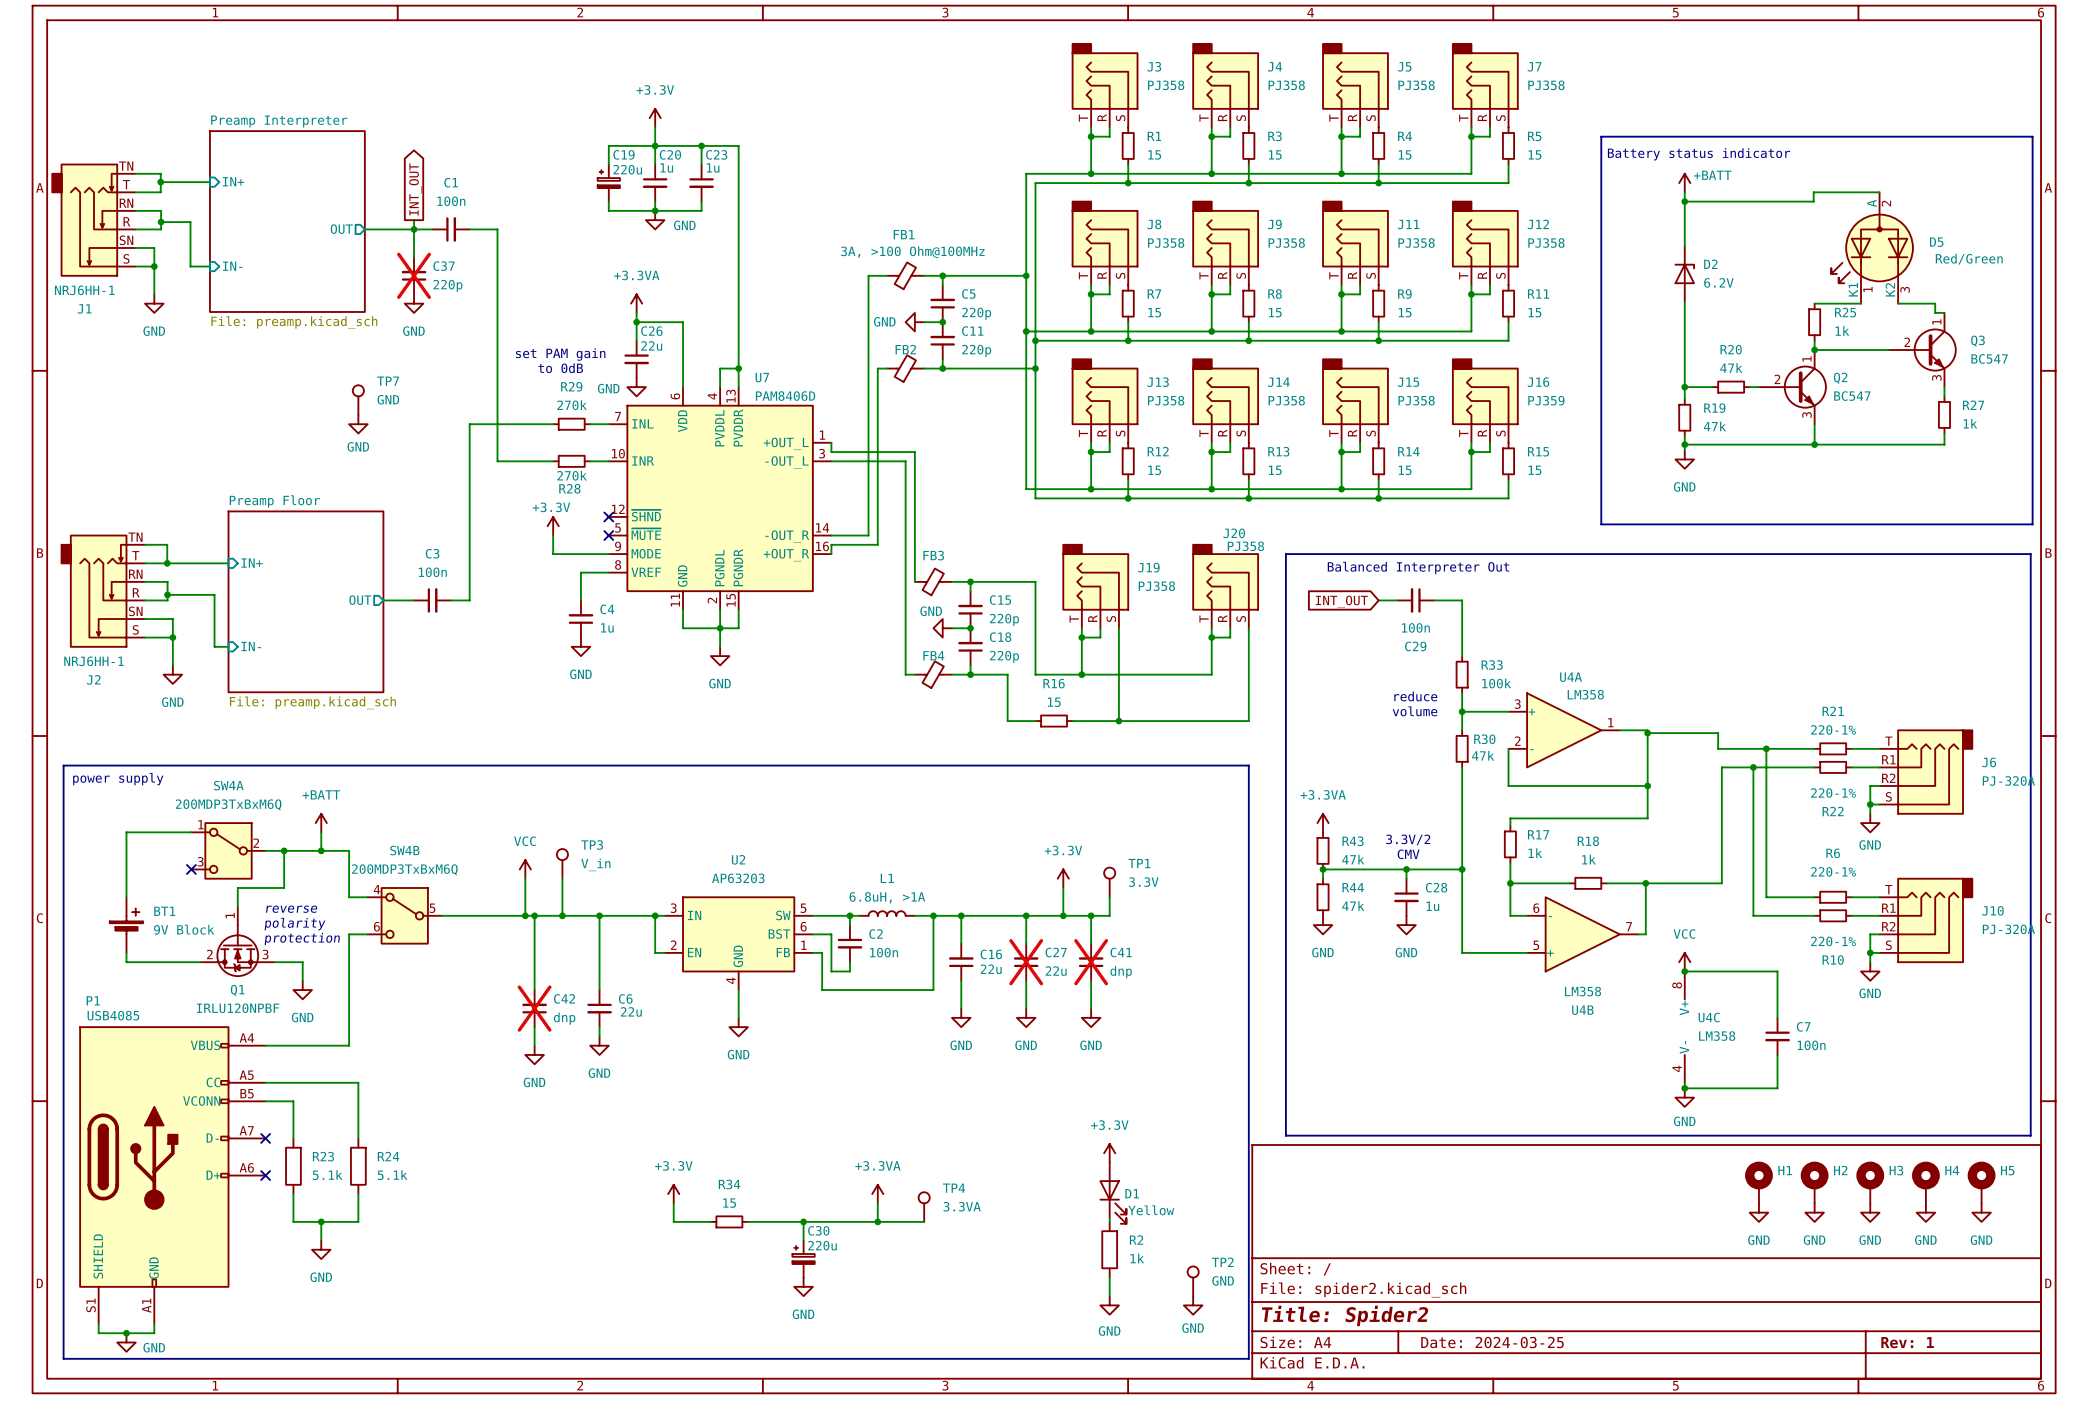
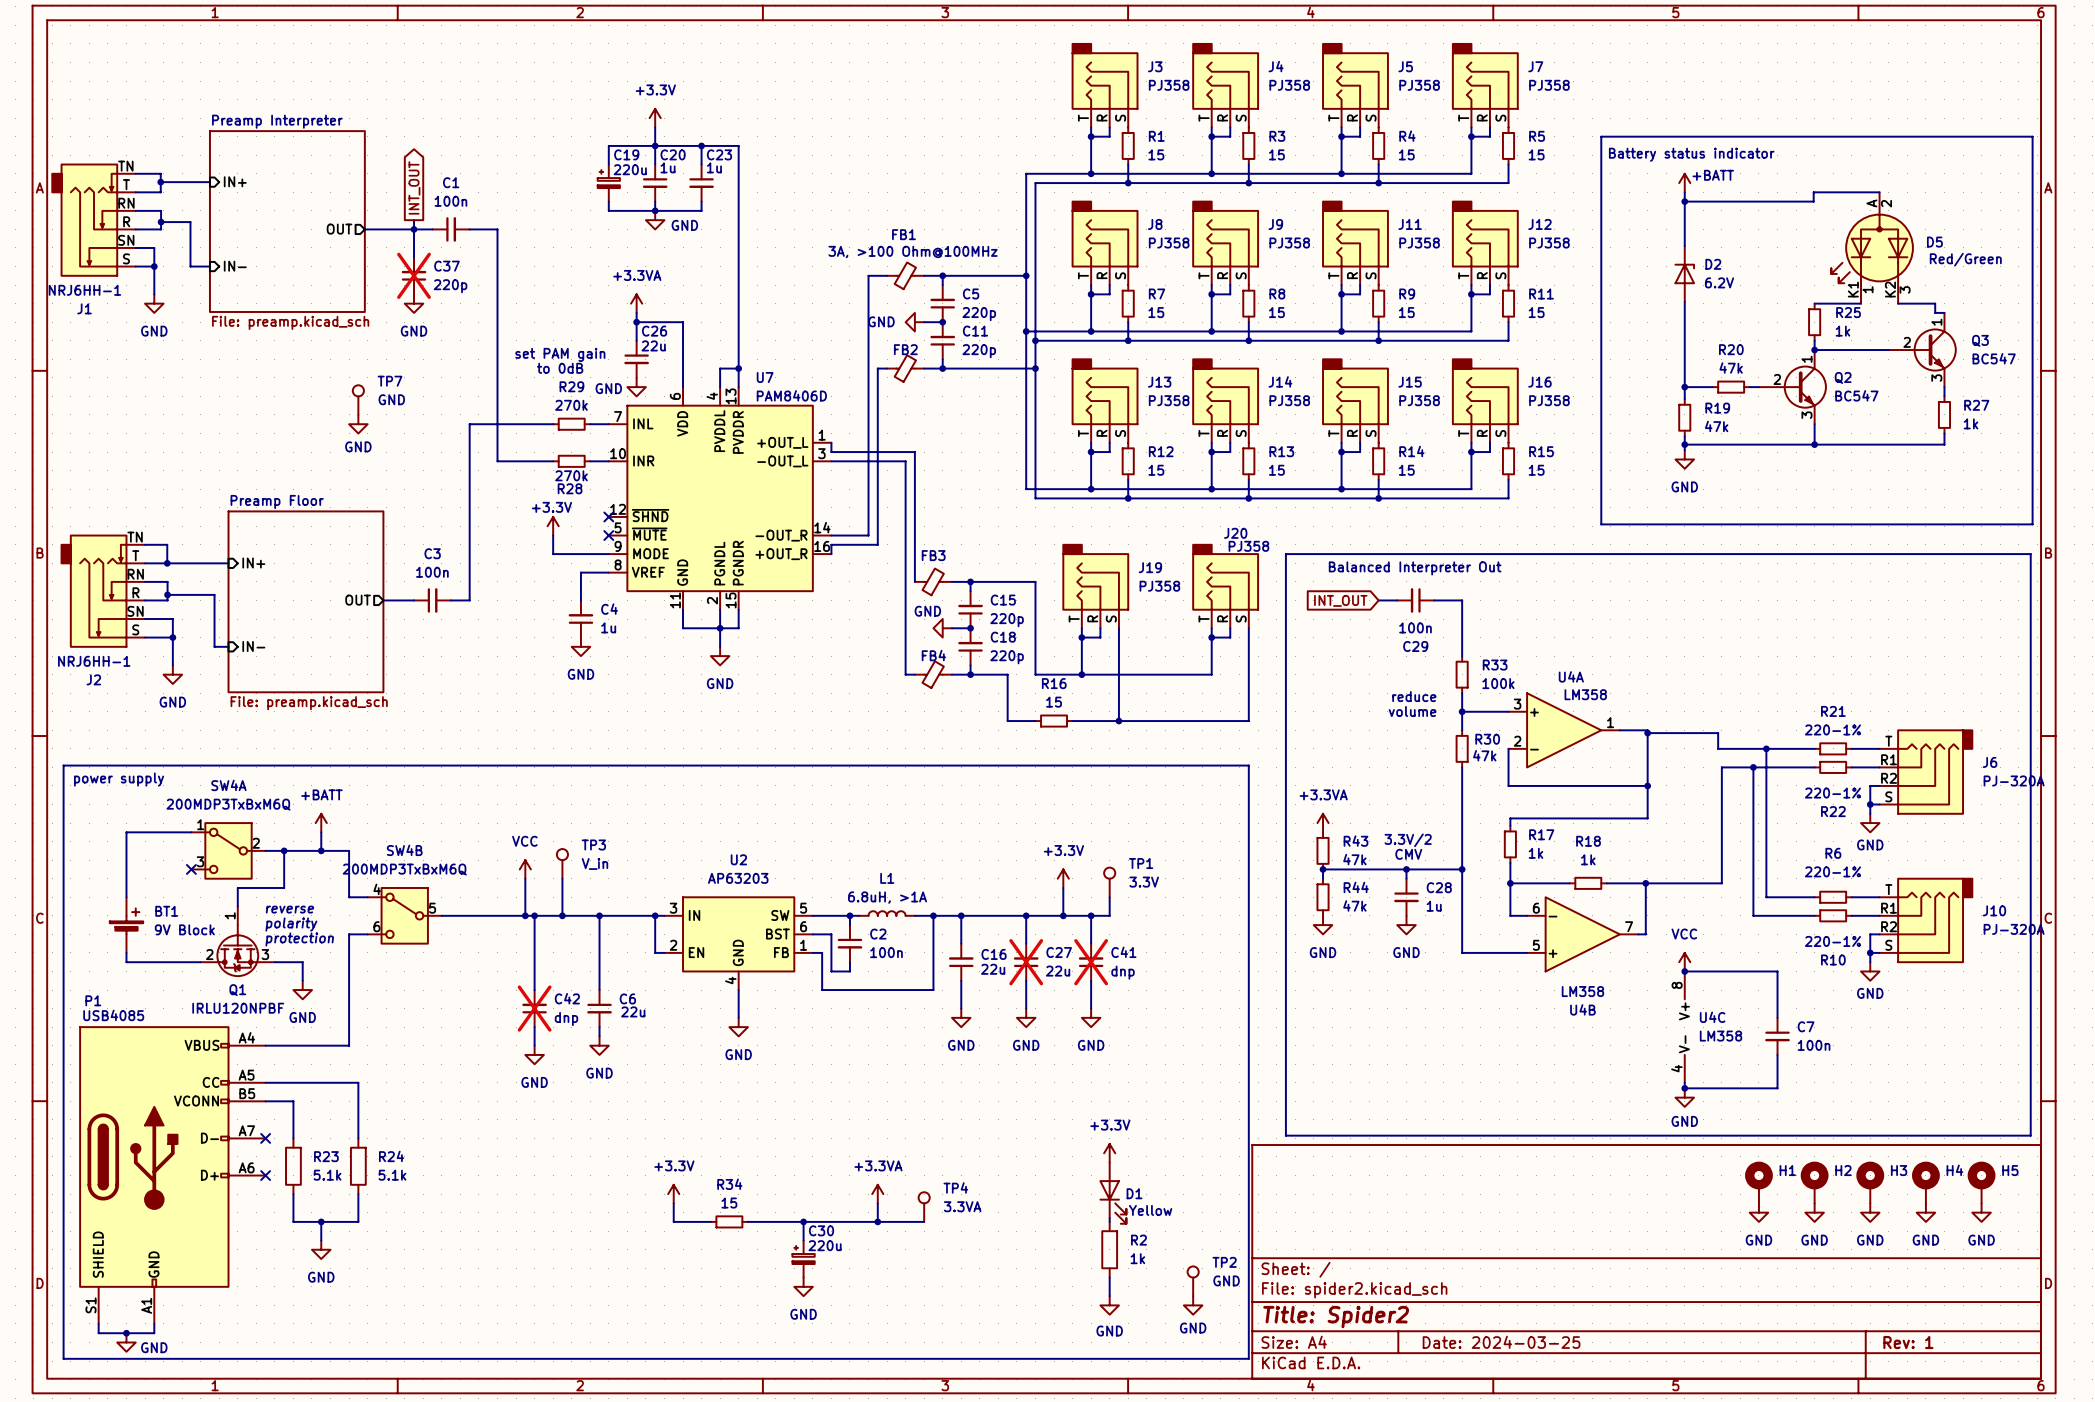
J16 value: PJ359 (1546, 400) -> PJ358 (1549, 400)

